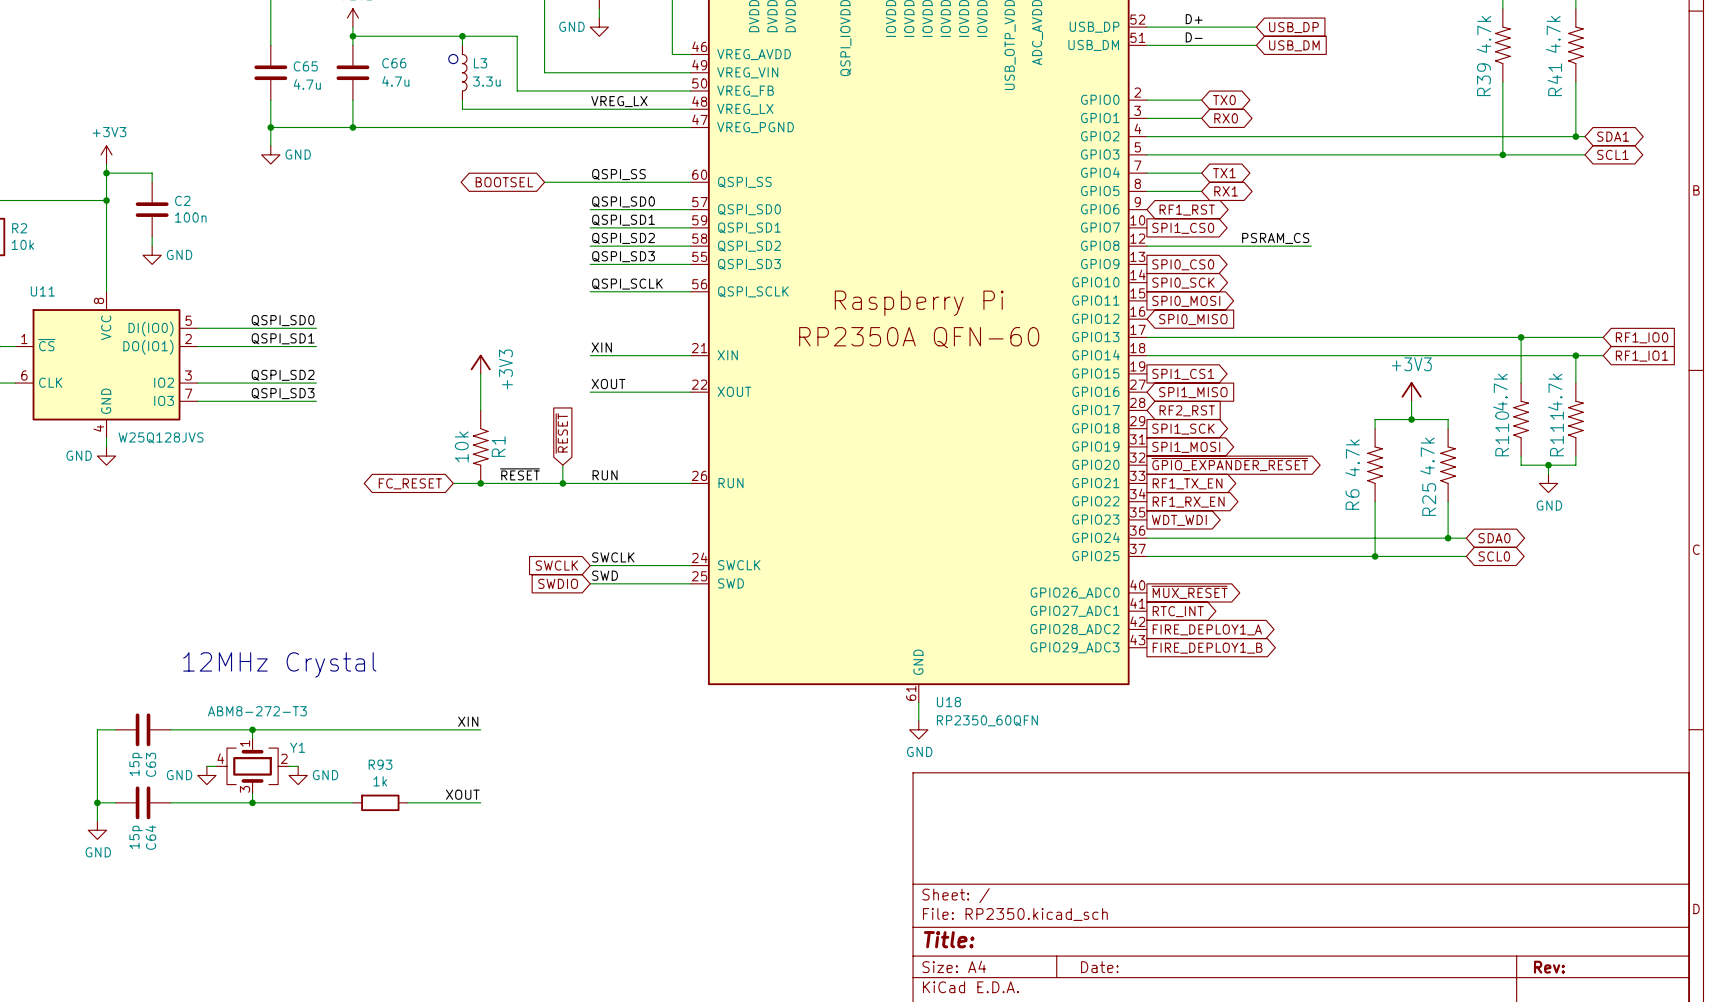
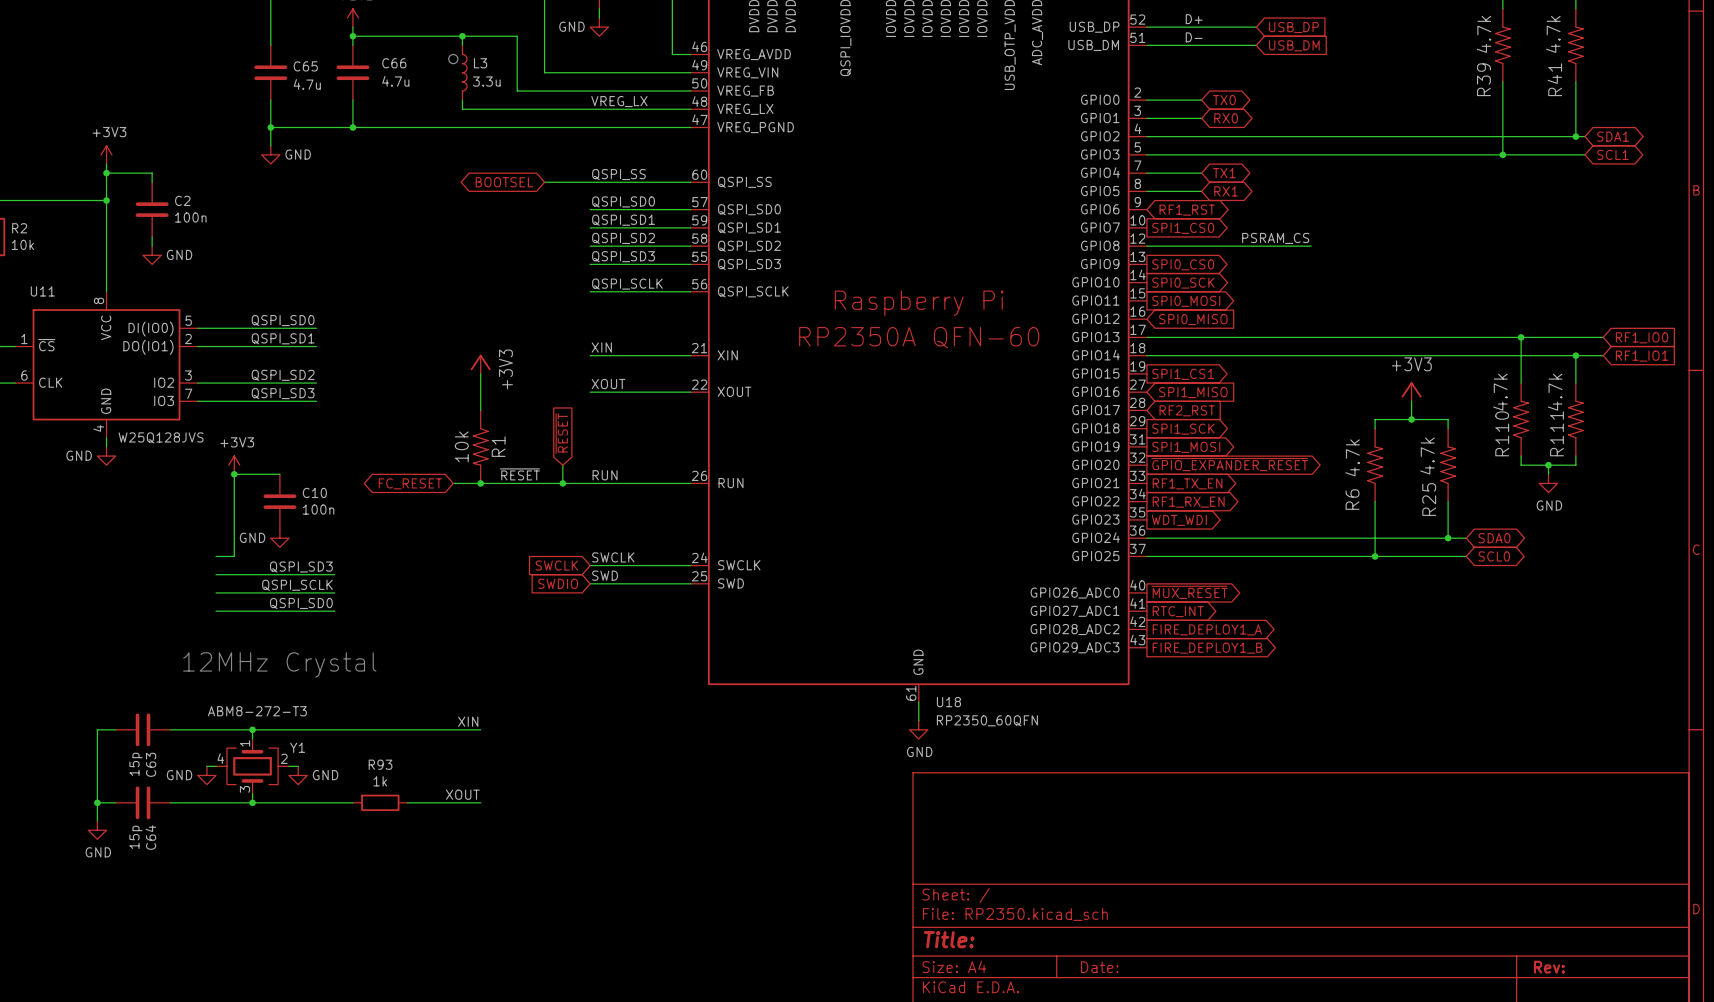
power symbol: none -> +3V3 (234, 465)
junction: none -> (234, 474)
wire: none -> (279, 474) (234, 474) (234, 556) (216, 556)
C10: none -> 100n (279, 501)
power symbol: none -> GND (279, 538)
label: none -> QSPI_SD3 (301, 566)
wire: none -> (216, 574) (334, 574)
label: none -> QSPI_SCLK (297, 585)
wire: none -> (216, 592) (334, 592)
label: none -> QSPI_SD0 (301, 603)
wire: none -> (216, 611) (334, 611)

